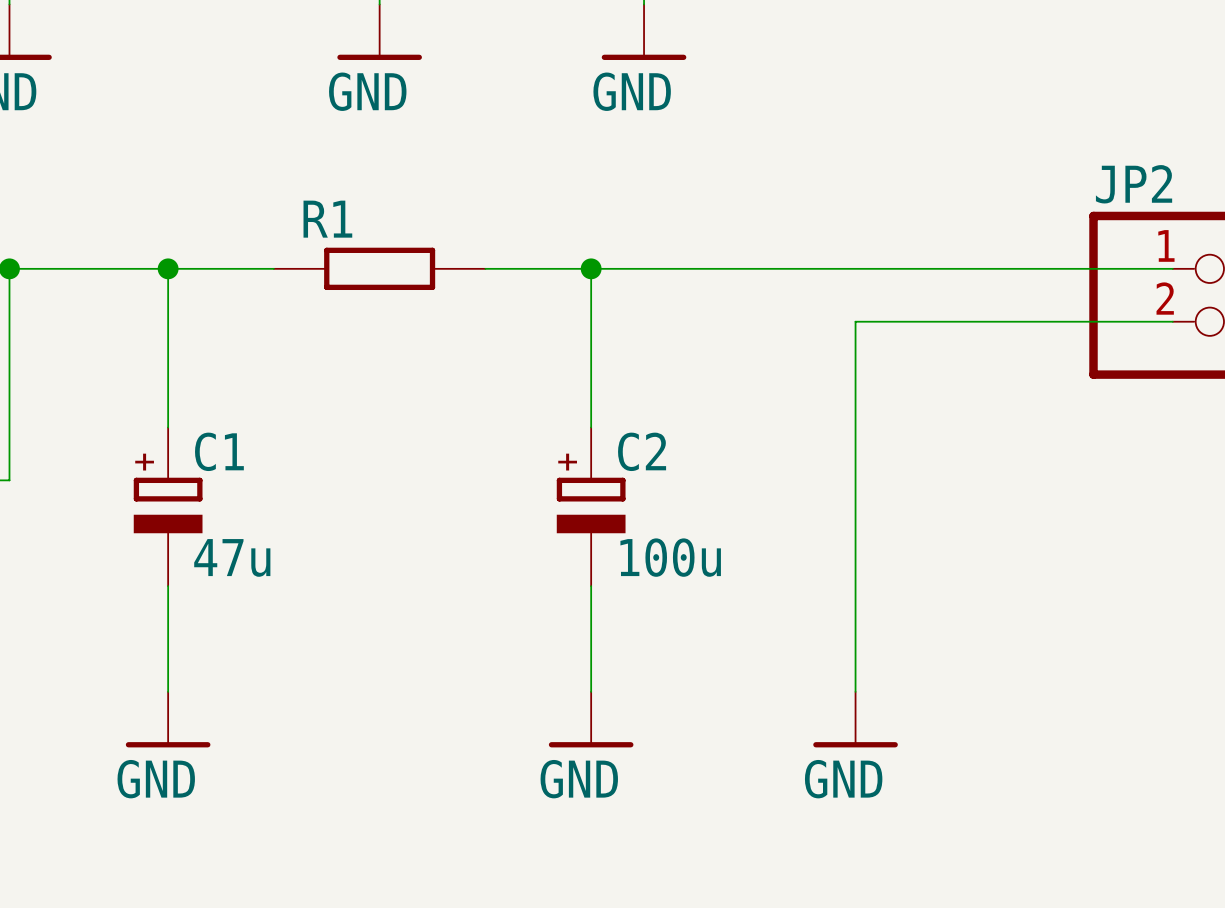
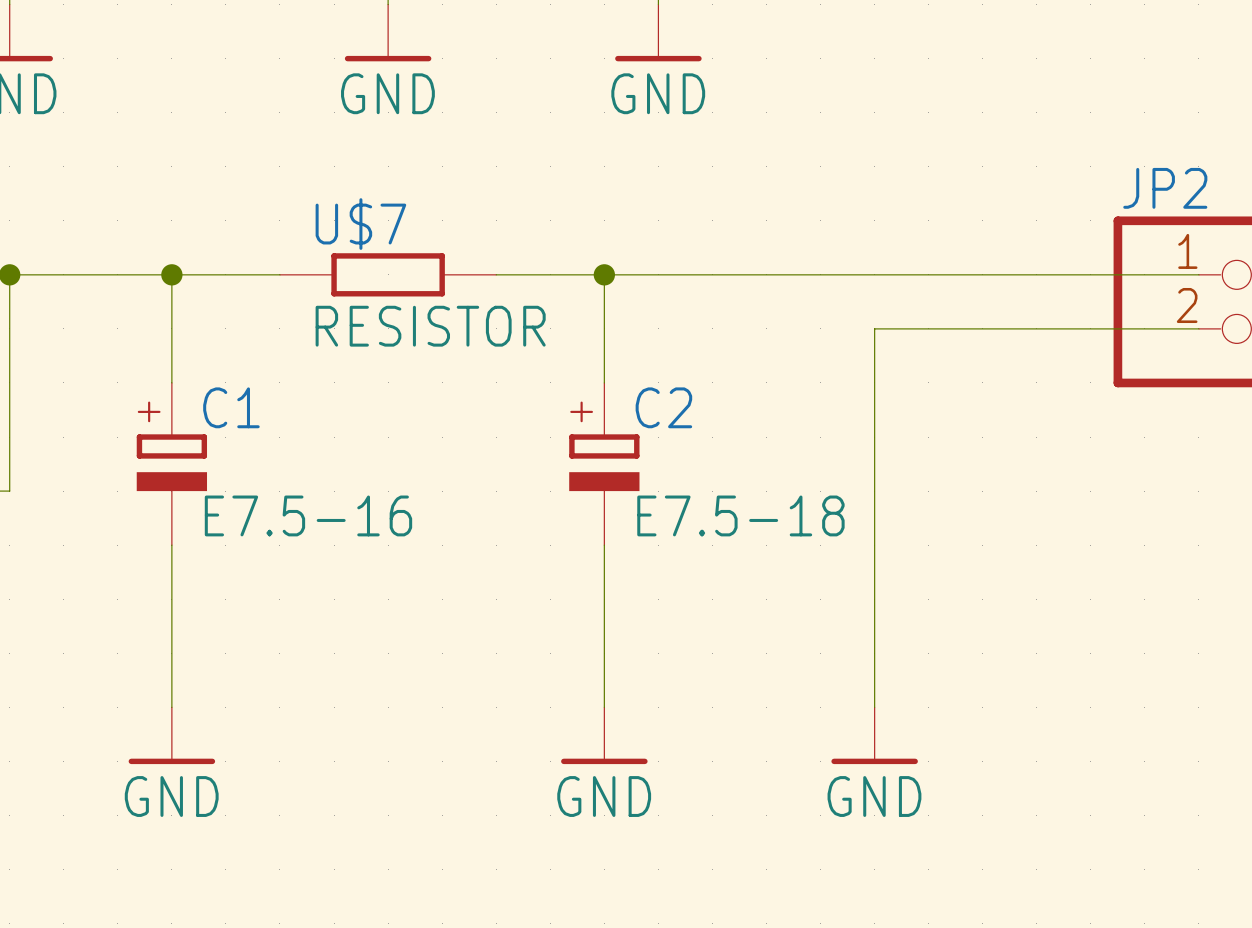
R1 name: R1 (327, 219) -> U$7 (360, 224)
R1 value: none -> RESISTOR (430, 326)
C1 position: (168, 506) -> (171, 464)
C2 position: (591, 506) -> (604, 464)
C1 value: 47u (232, 557) -> E7.5-16 (308, 515)
C2 value: 100u (670, 557) -> E7.5-18 (740, 515)

